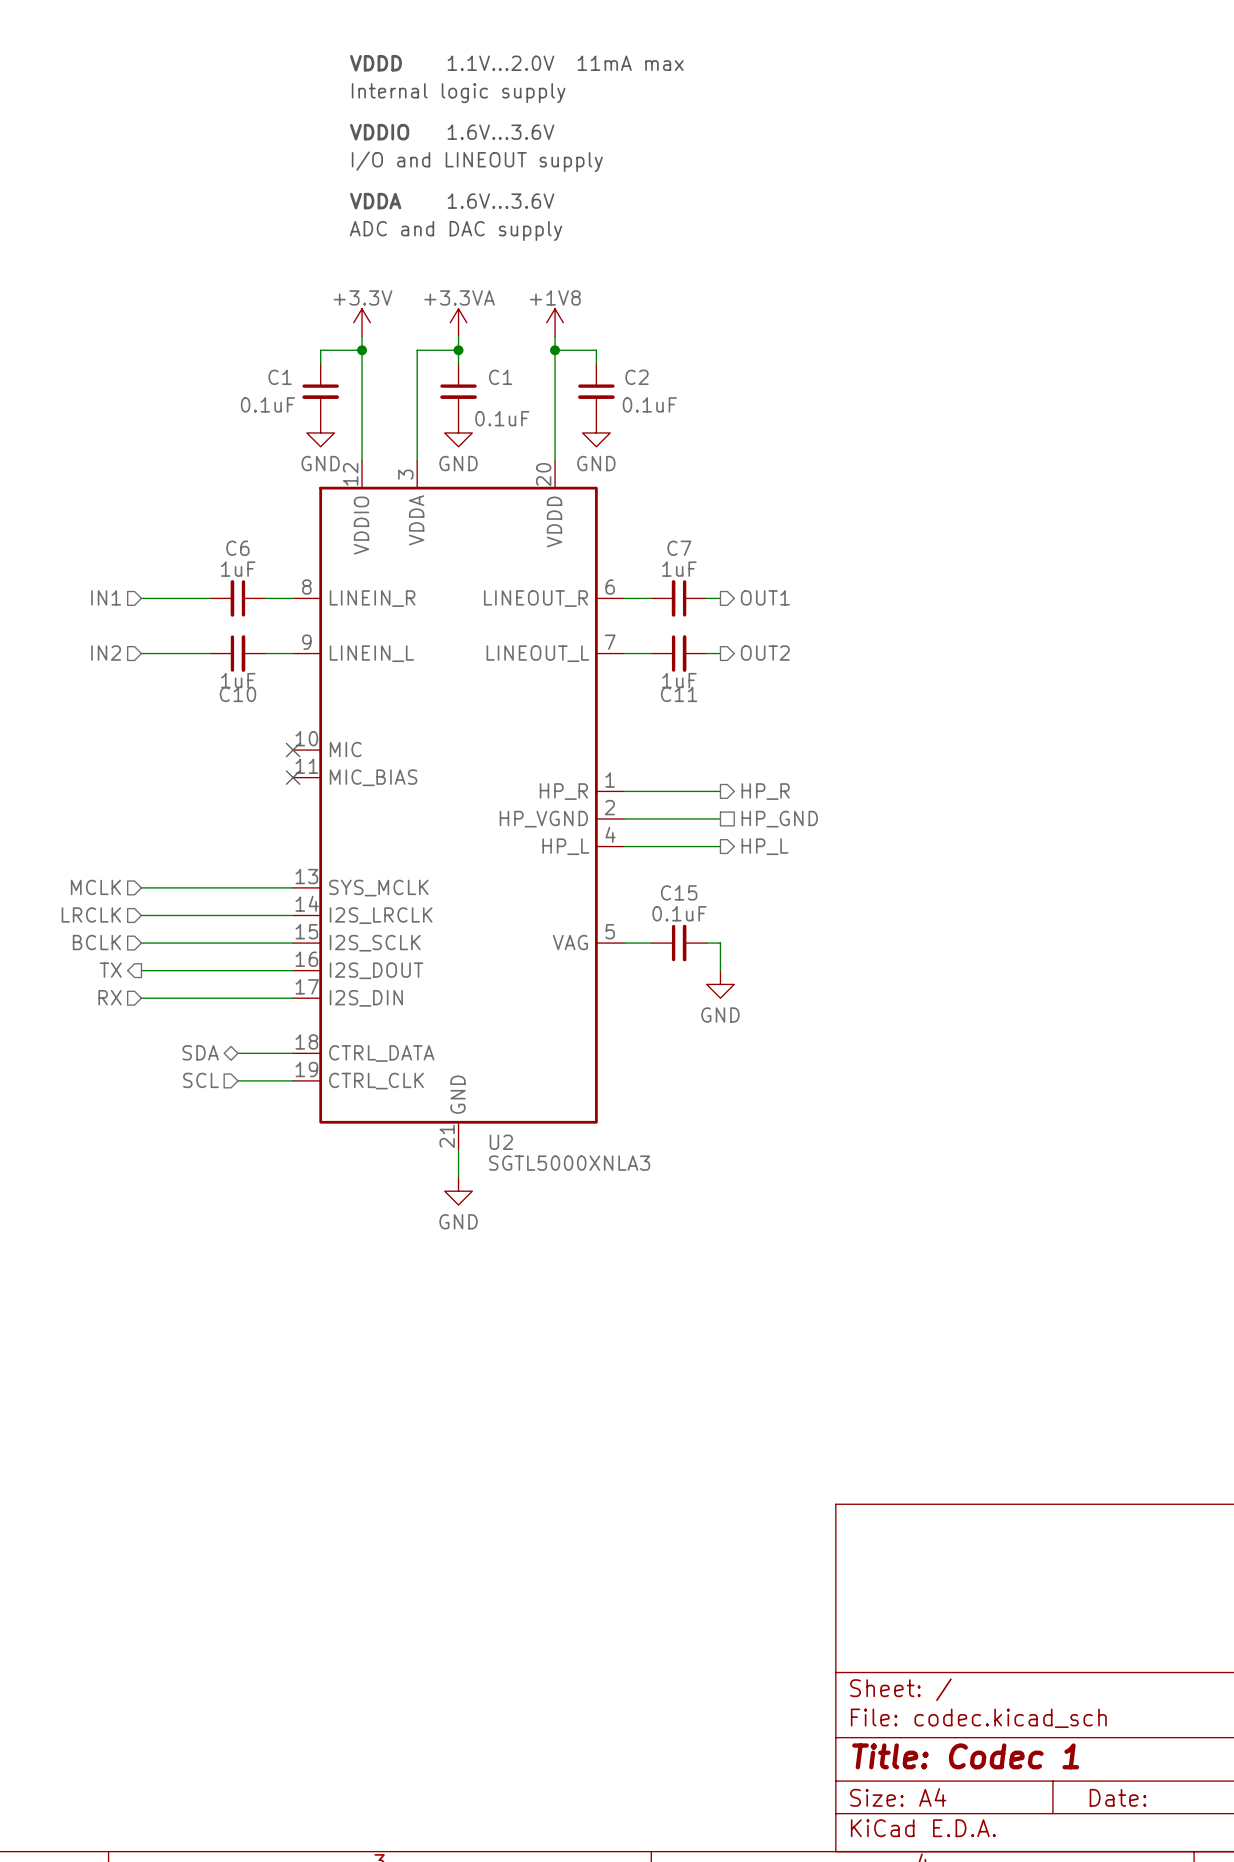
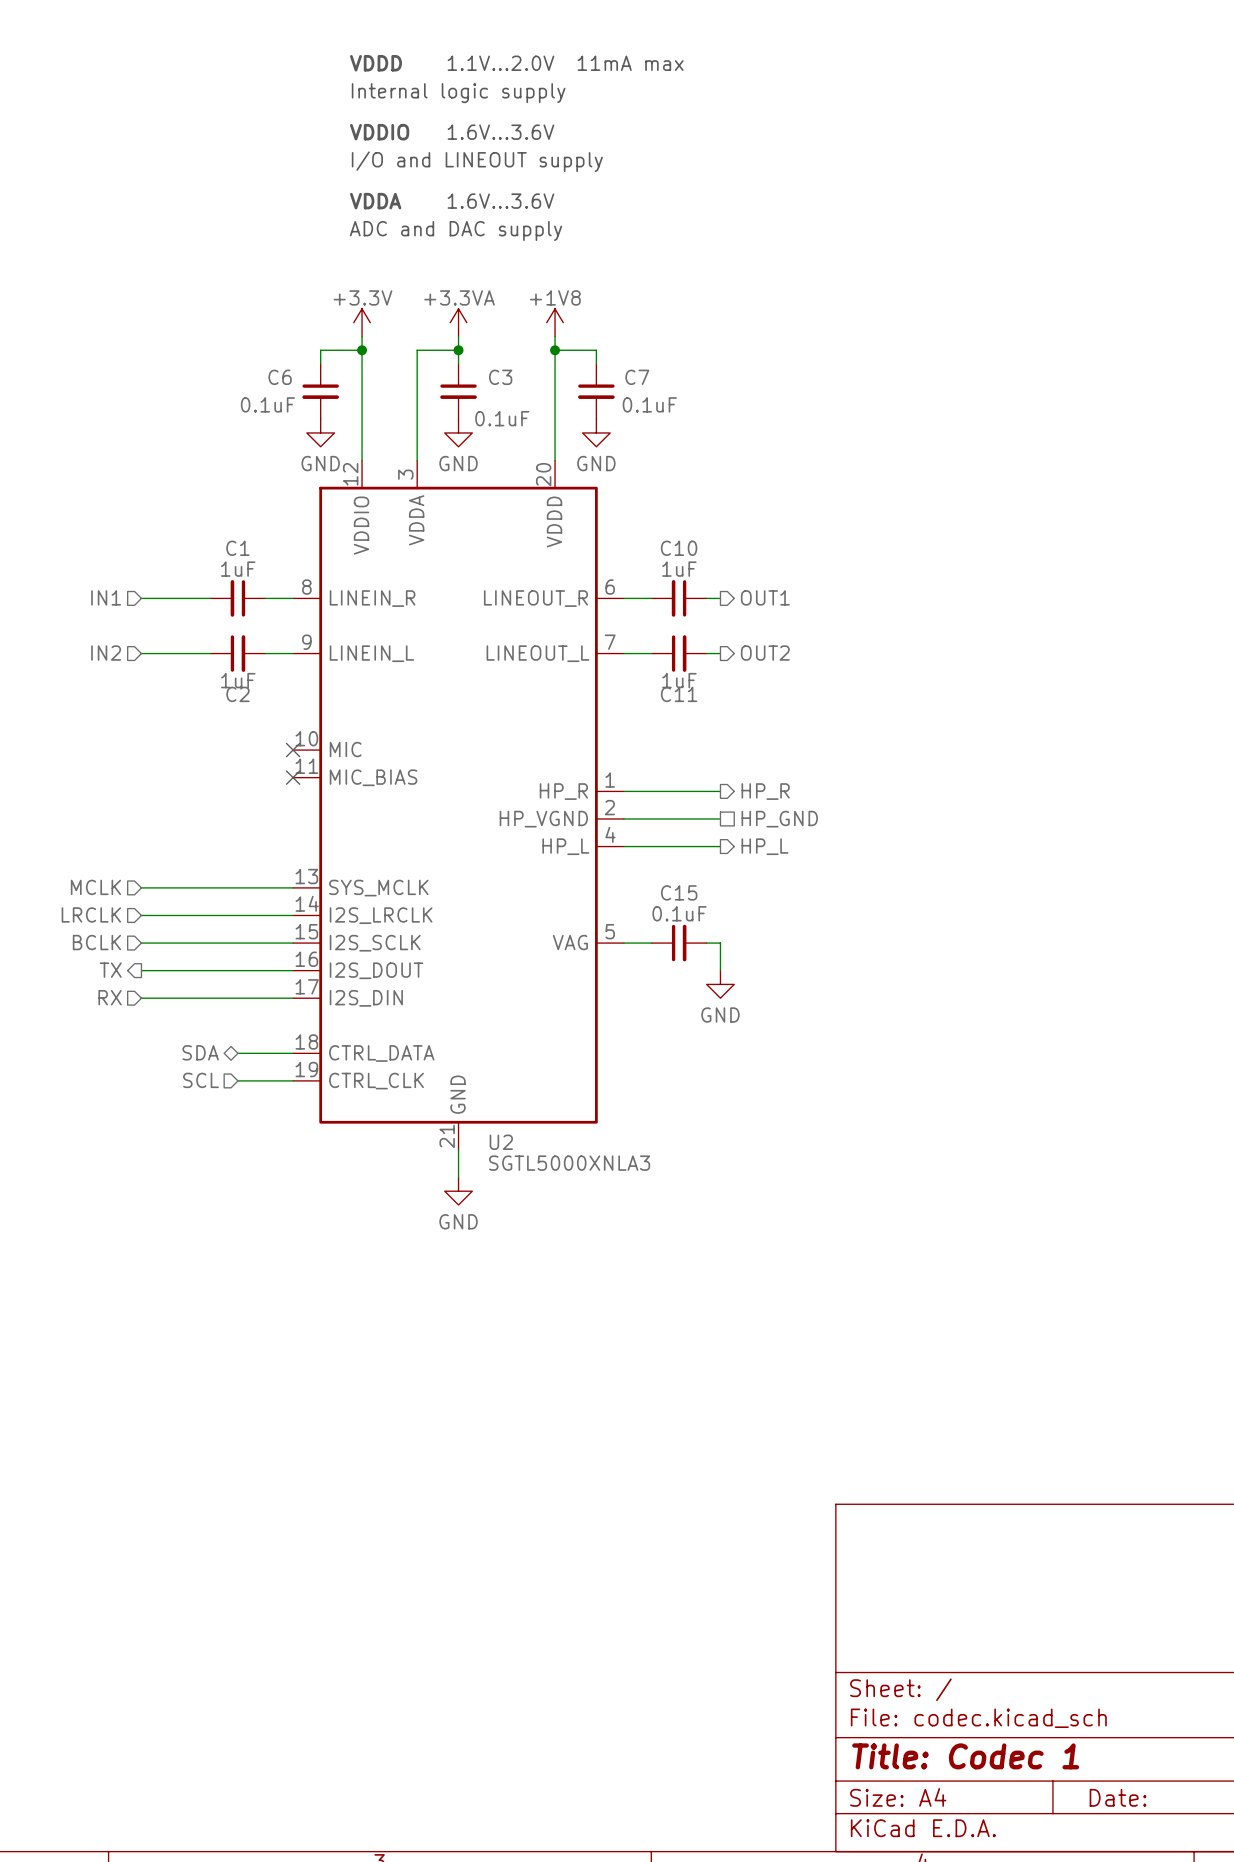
C1 name: C1 (280, 377) -> C6 (280, 377)
C1 name: C1 (500, 377) -> C3 (500, 377)
C2 name: C2 (636, 377) -> C7 (637, 377)
C6 name: C6 (237, 548) -> C1 (237, 548)
C7 name: C7 (679, 548) -> C10 (679, 548)
C10 name: C10 (237, 694) -> C2 (237, 694)

